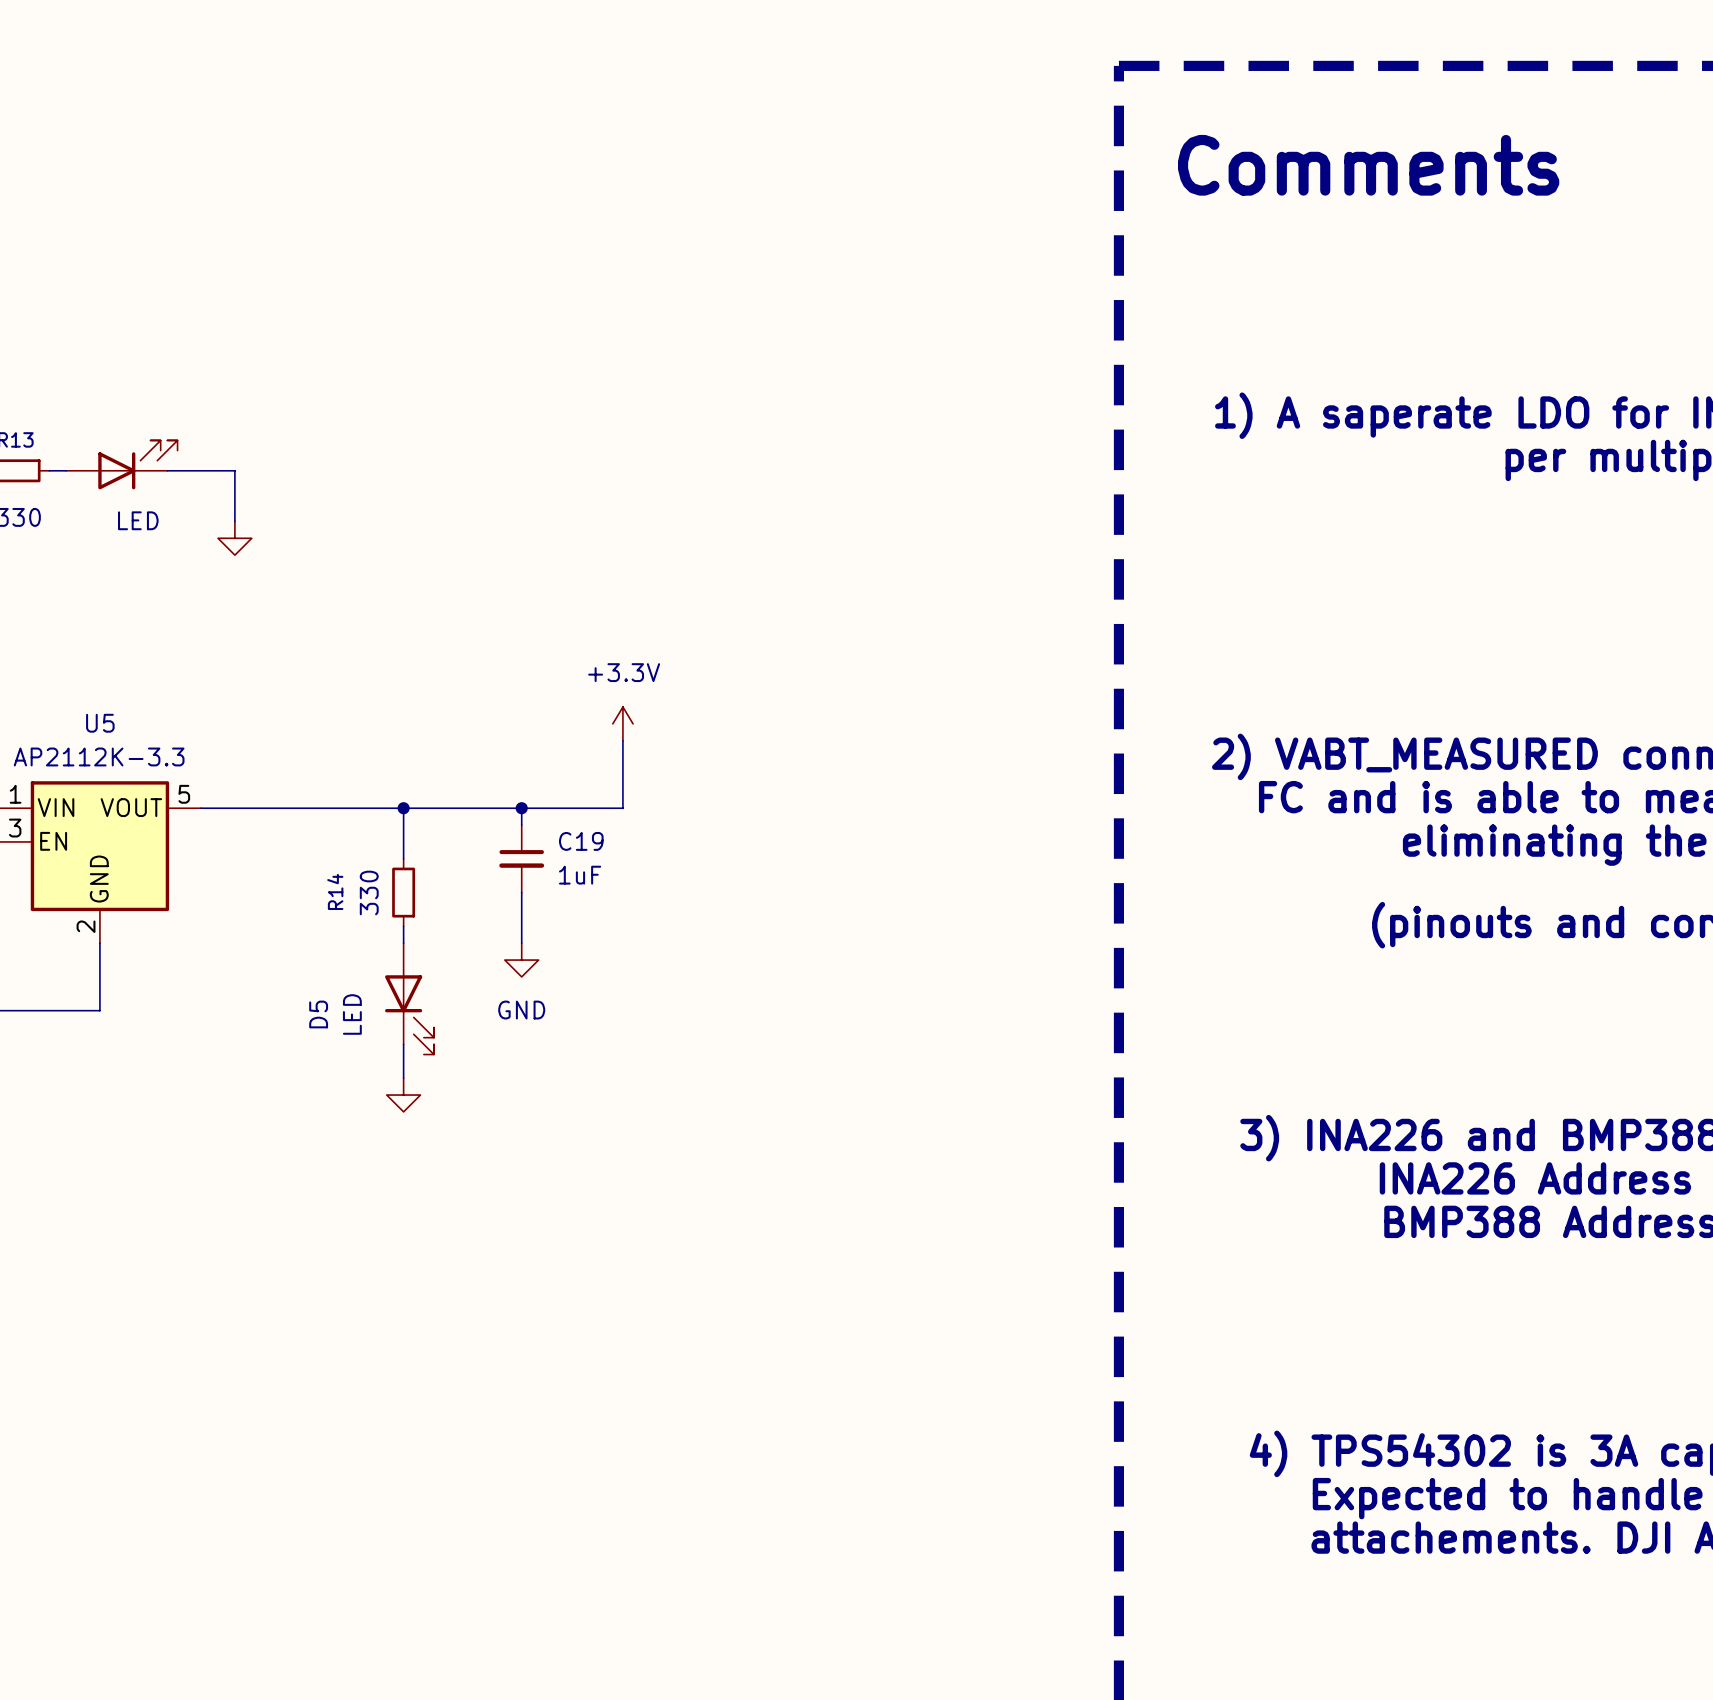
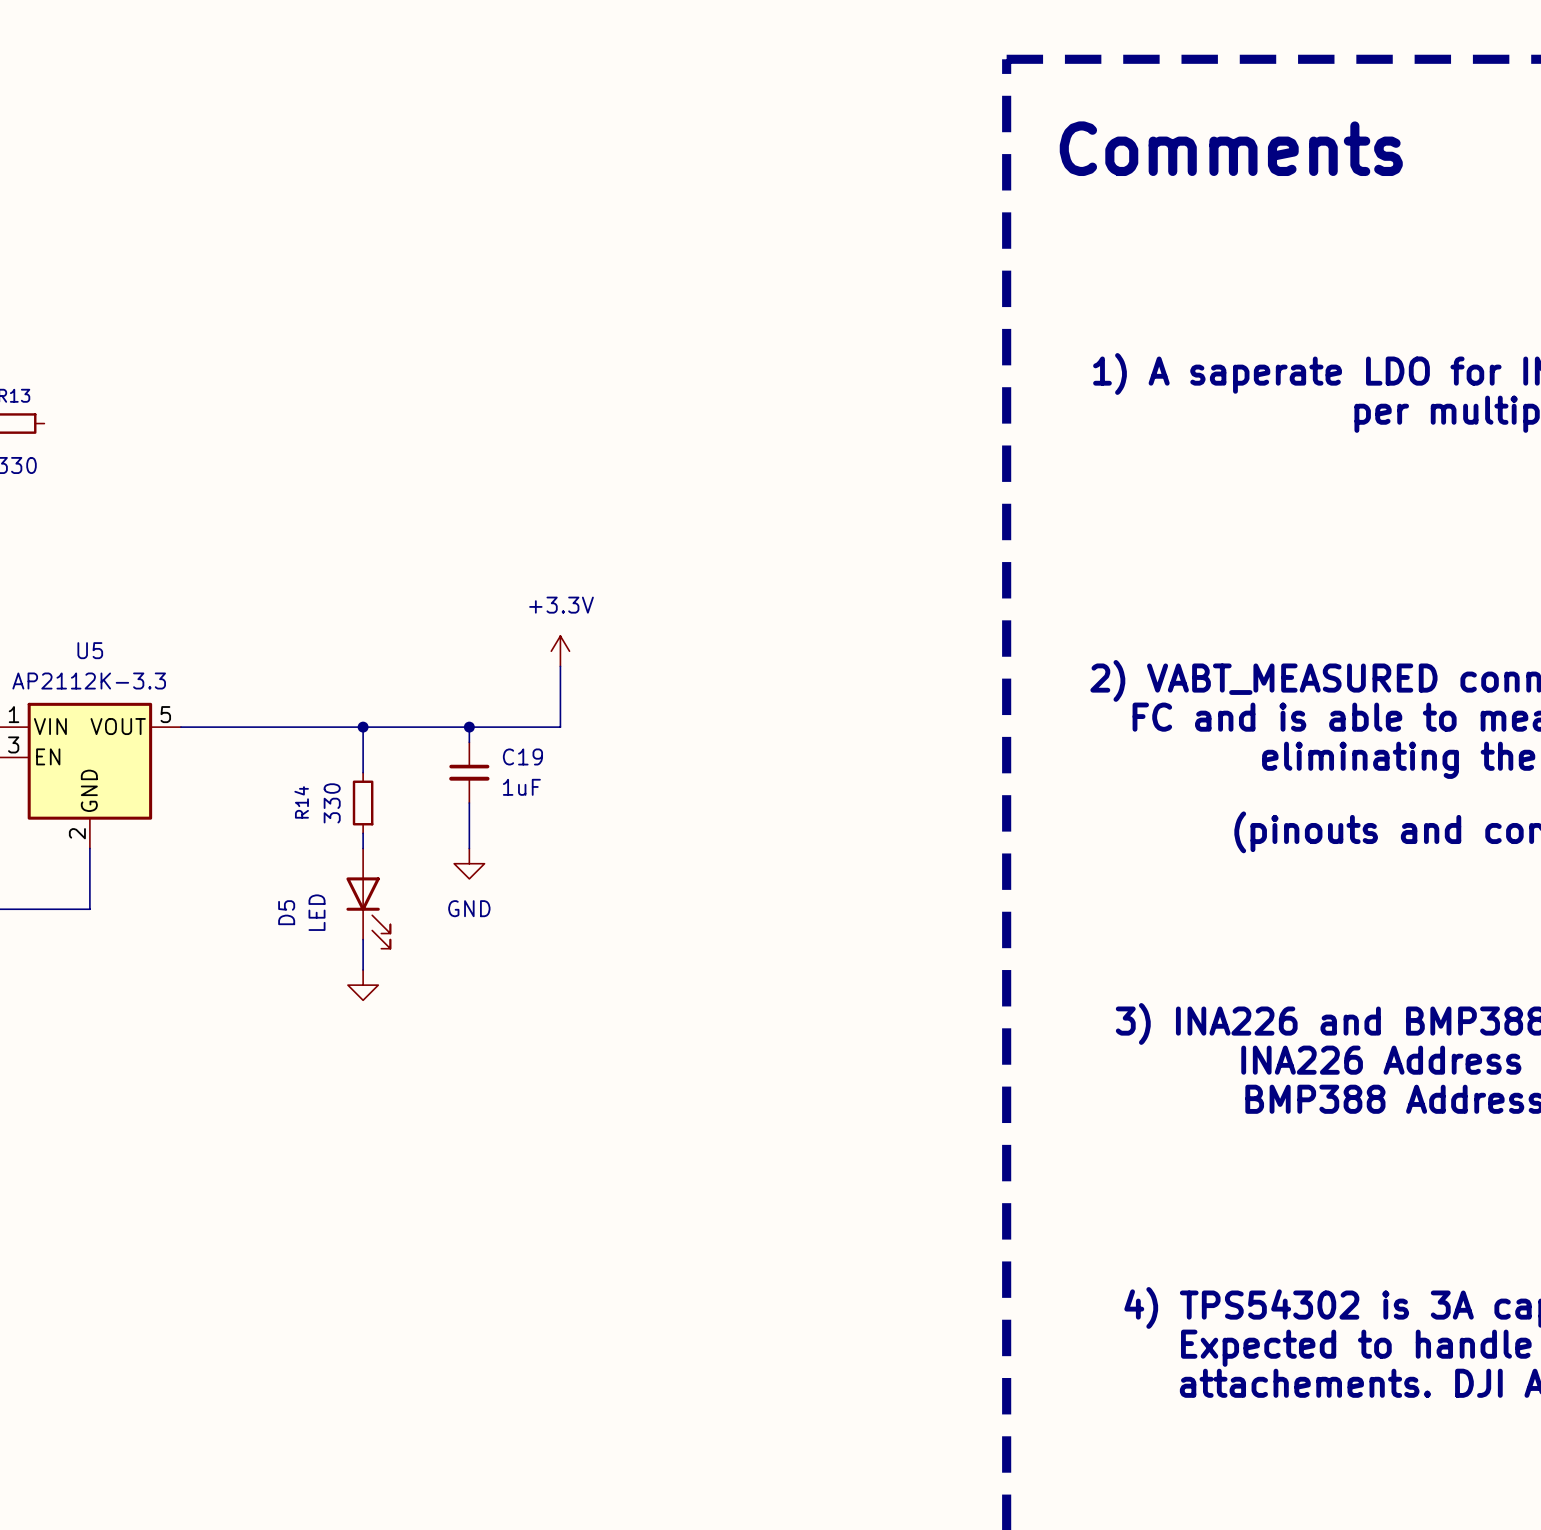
part: LED (121, 464) -> none
wire: (49, 470) (66, 470) -> none
wire: (167, 470) (234, 470) (234, 521) -> none
power symbol: (234, 538) -> none

